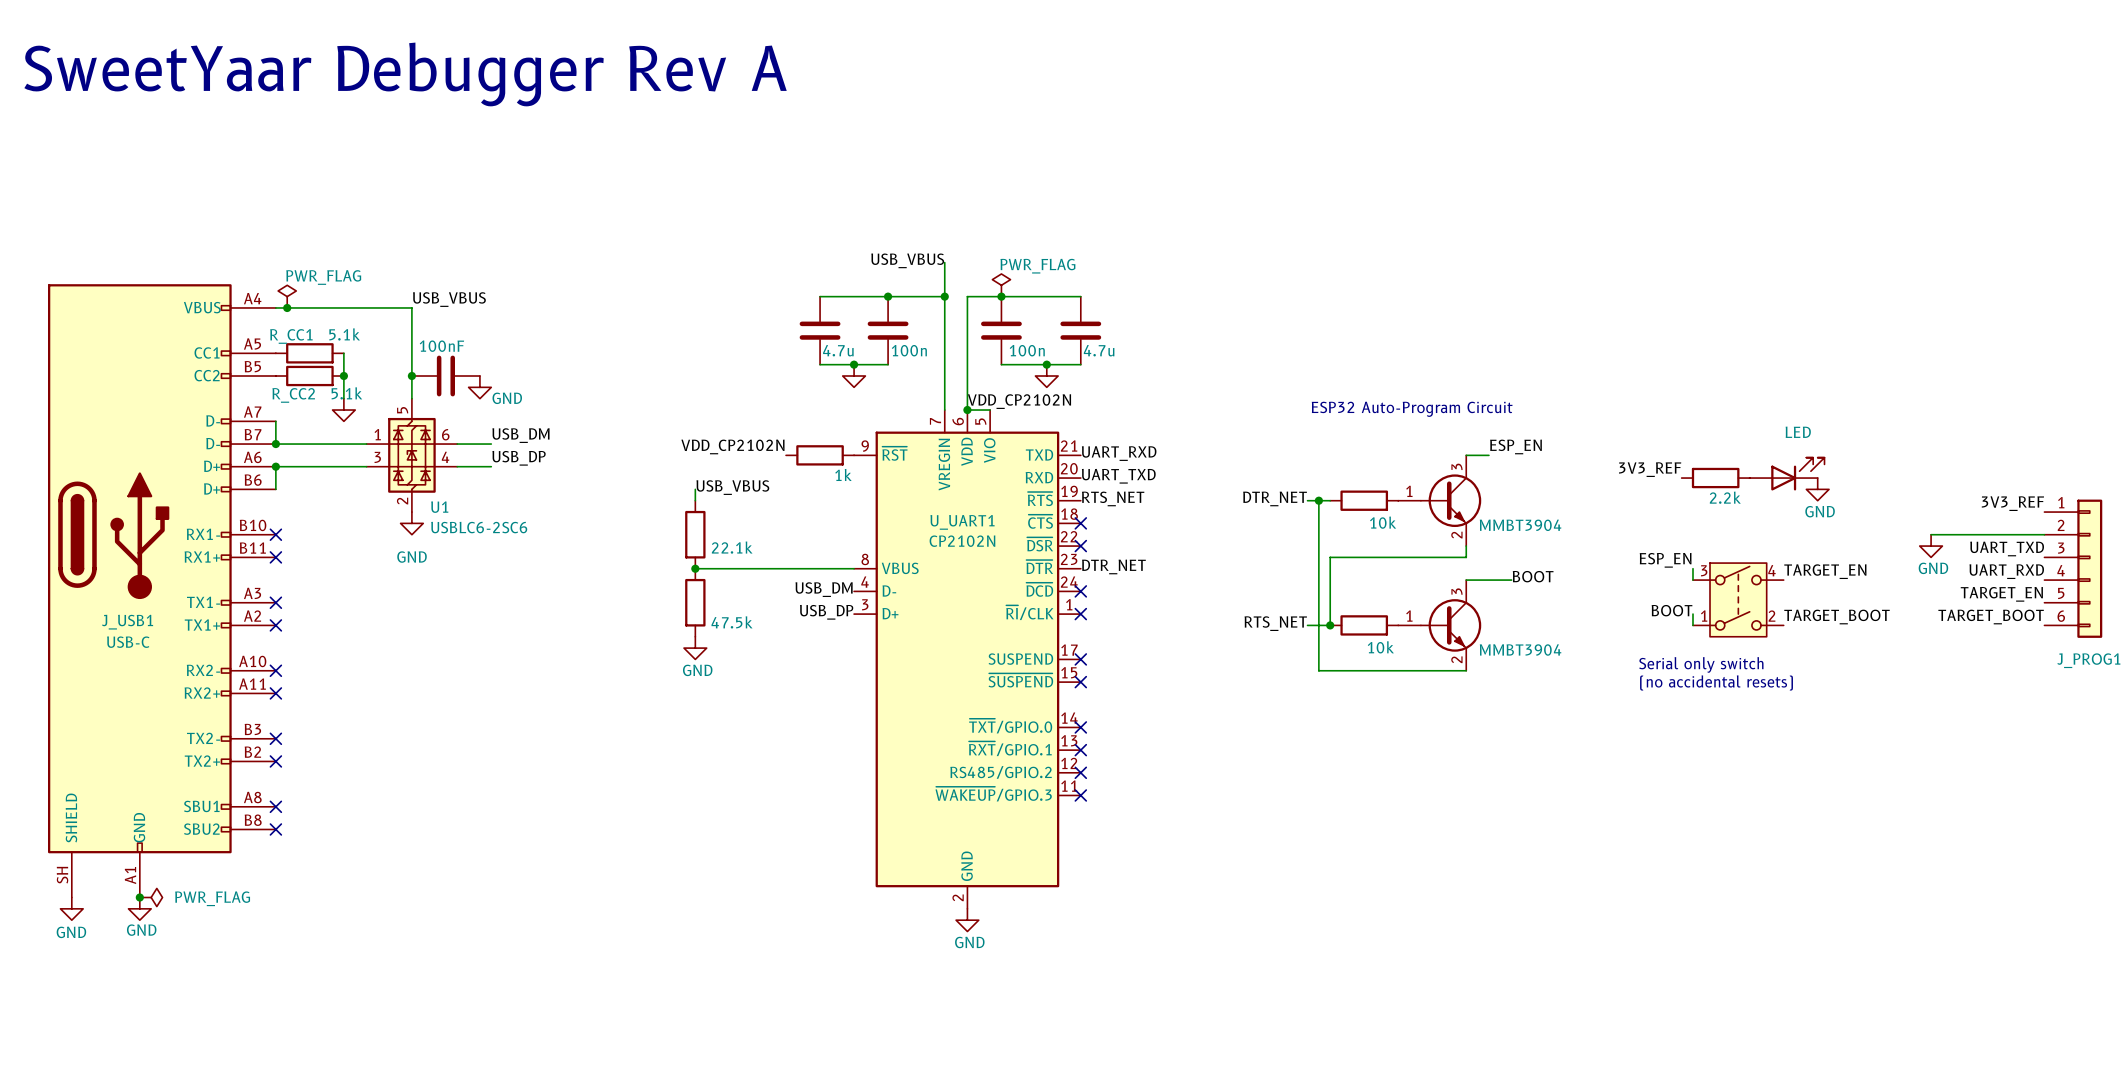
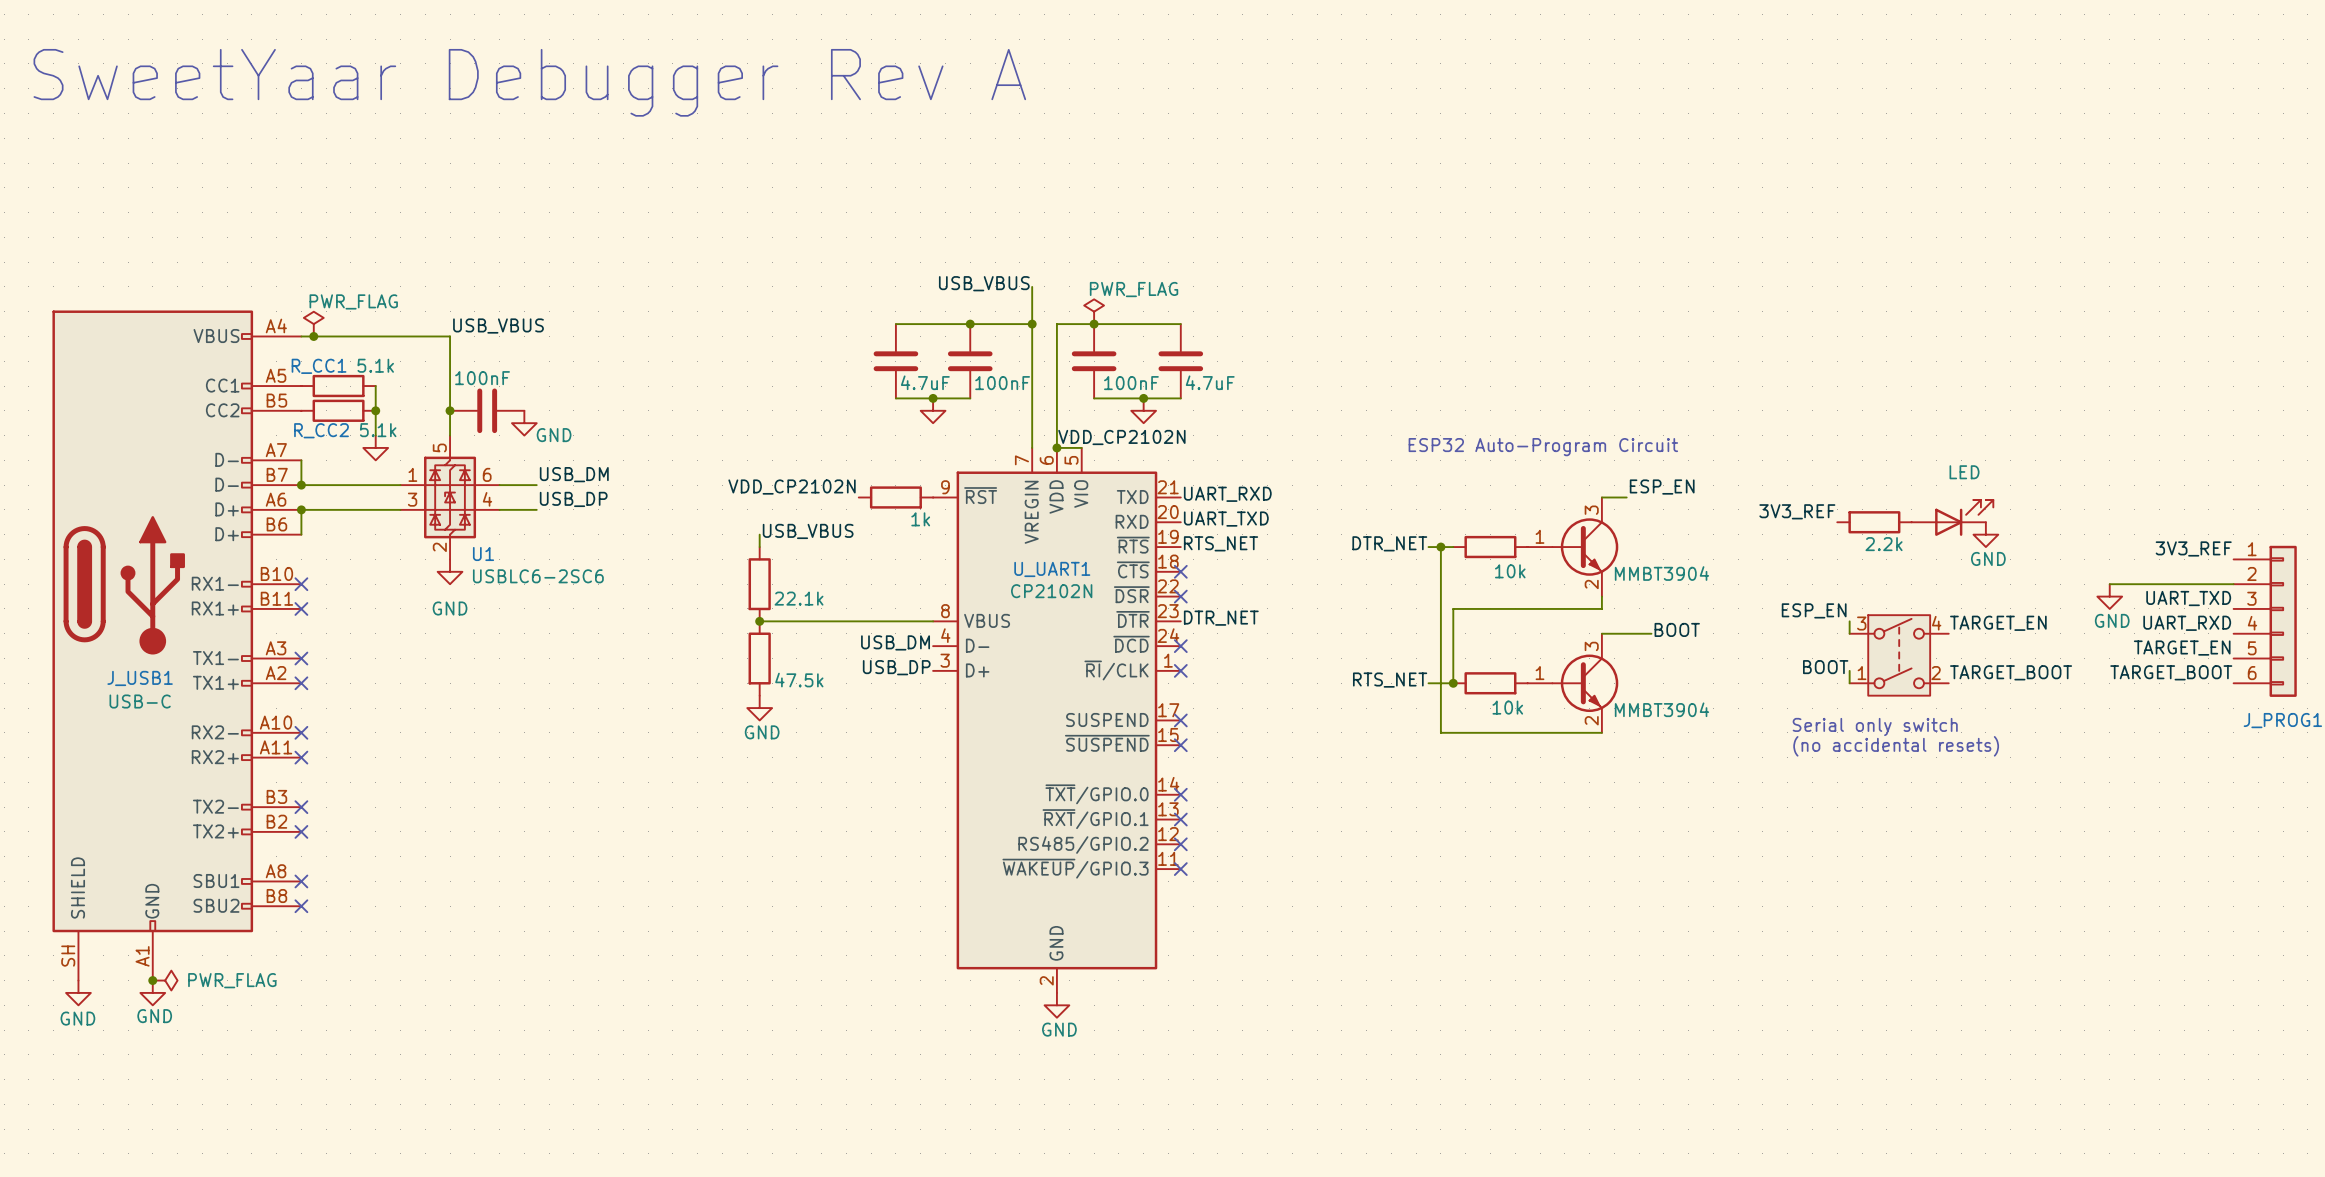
part value: 4.7u (838, 350) -> 4.7uF (925, 382)
part value: 100n (909, 350) -> 100nF (1002, 383)
part value: 100n (1027, 350) -> 100nF (1131, 383)
part value: 4.7u (1099, 350) -> 4.7uF (1210, 382)

